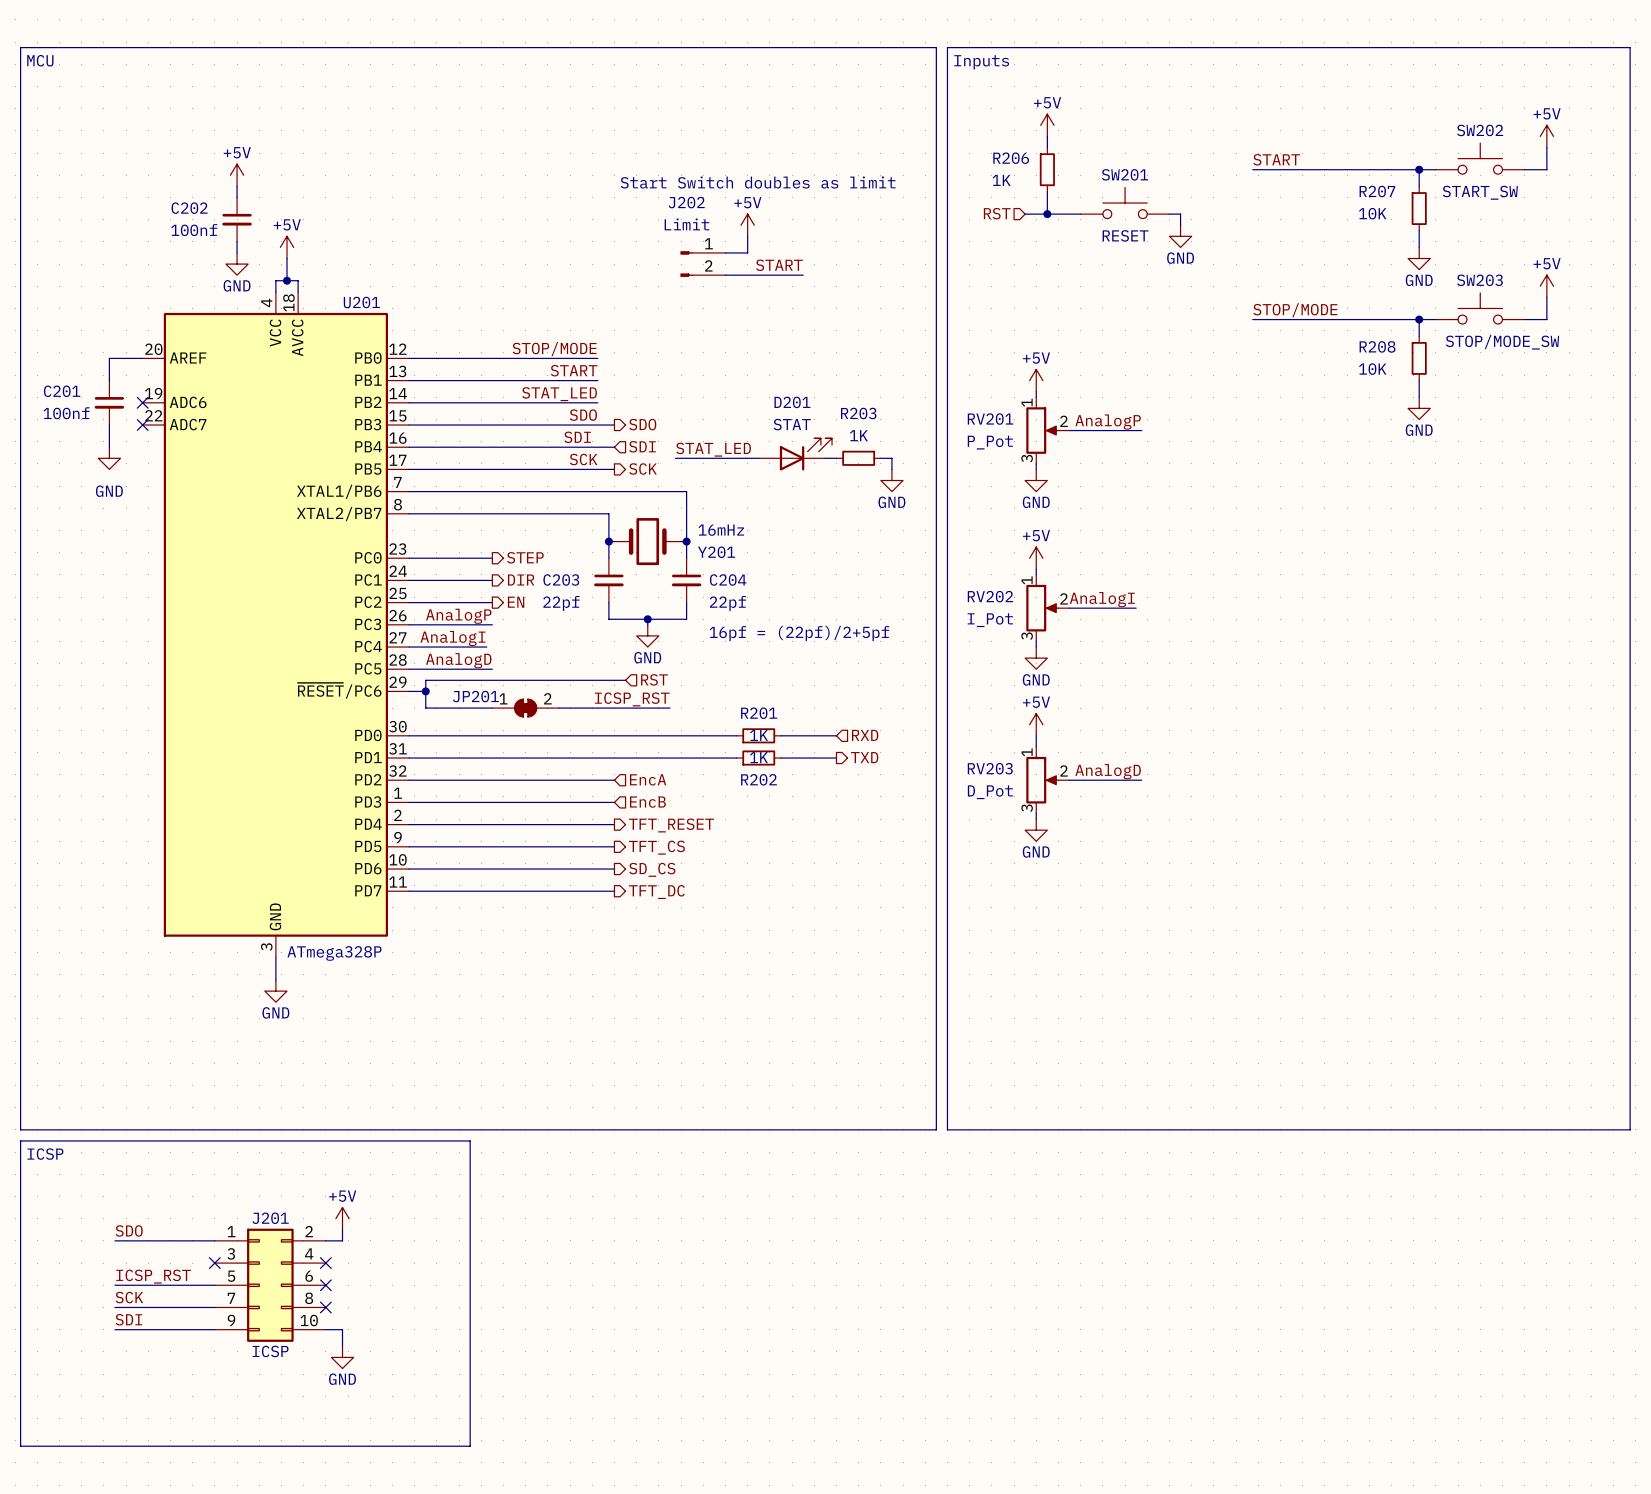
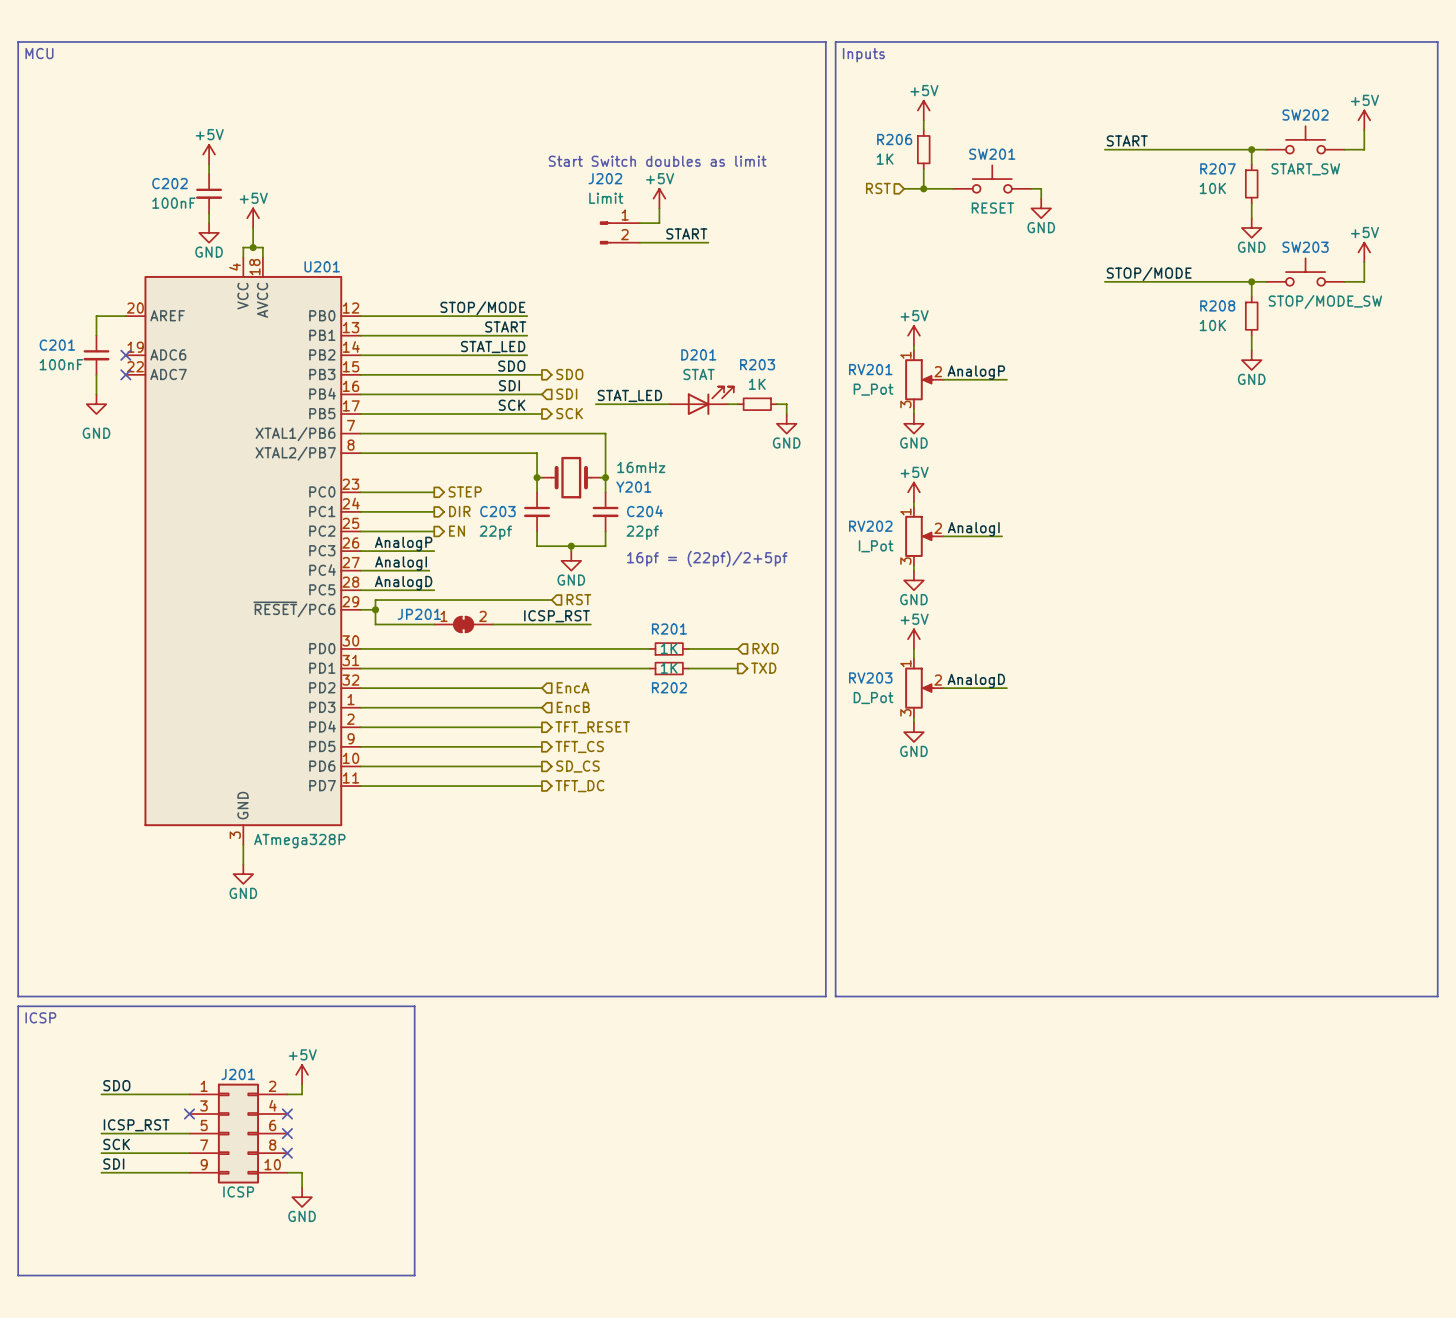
C202 value: 100nf (194, 230) -> 100nF (173, 203)
C201 value: 100nf (66, 413) -> 100nF (61, 364)

